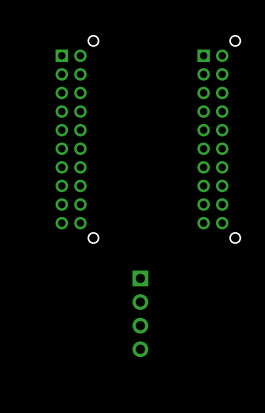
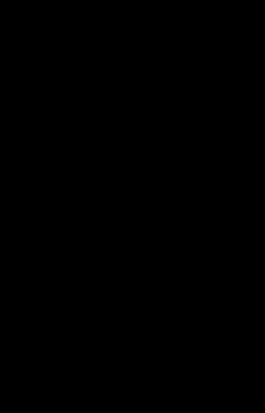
part: (77, 139) -> none
part: (218, 139) -> none
part: (140, 313) -> none

